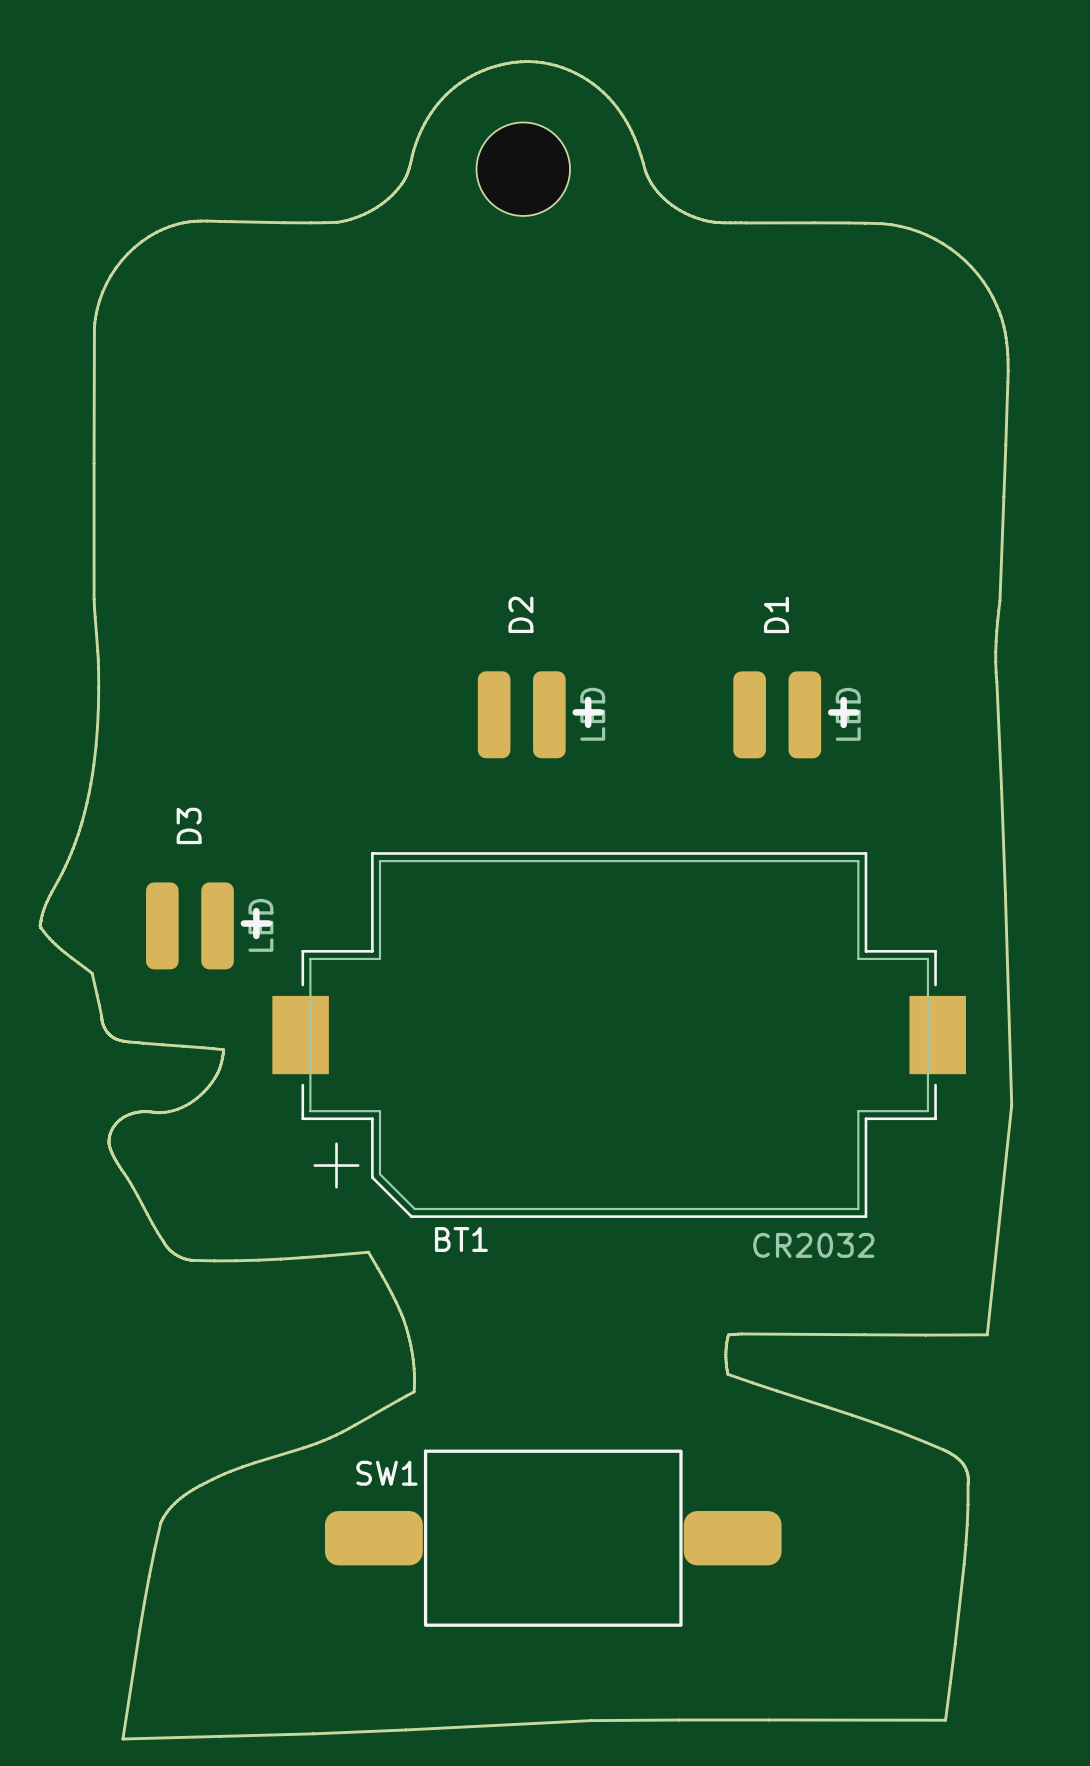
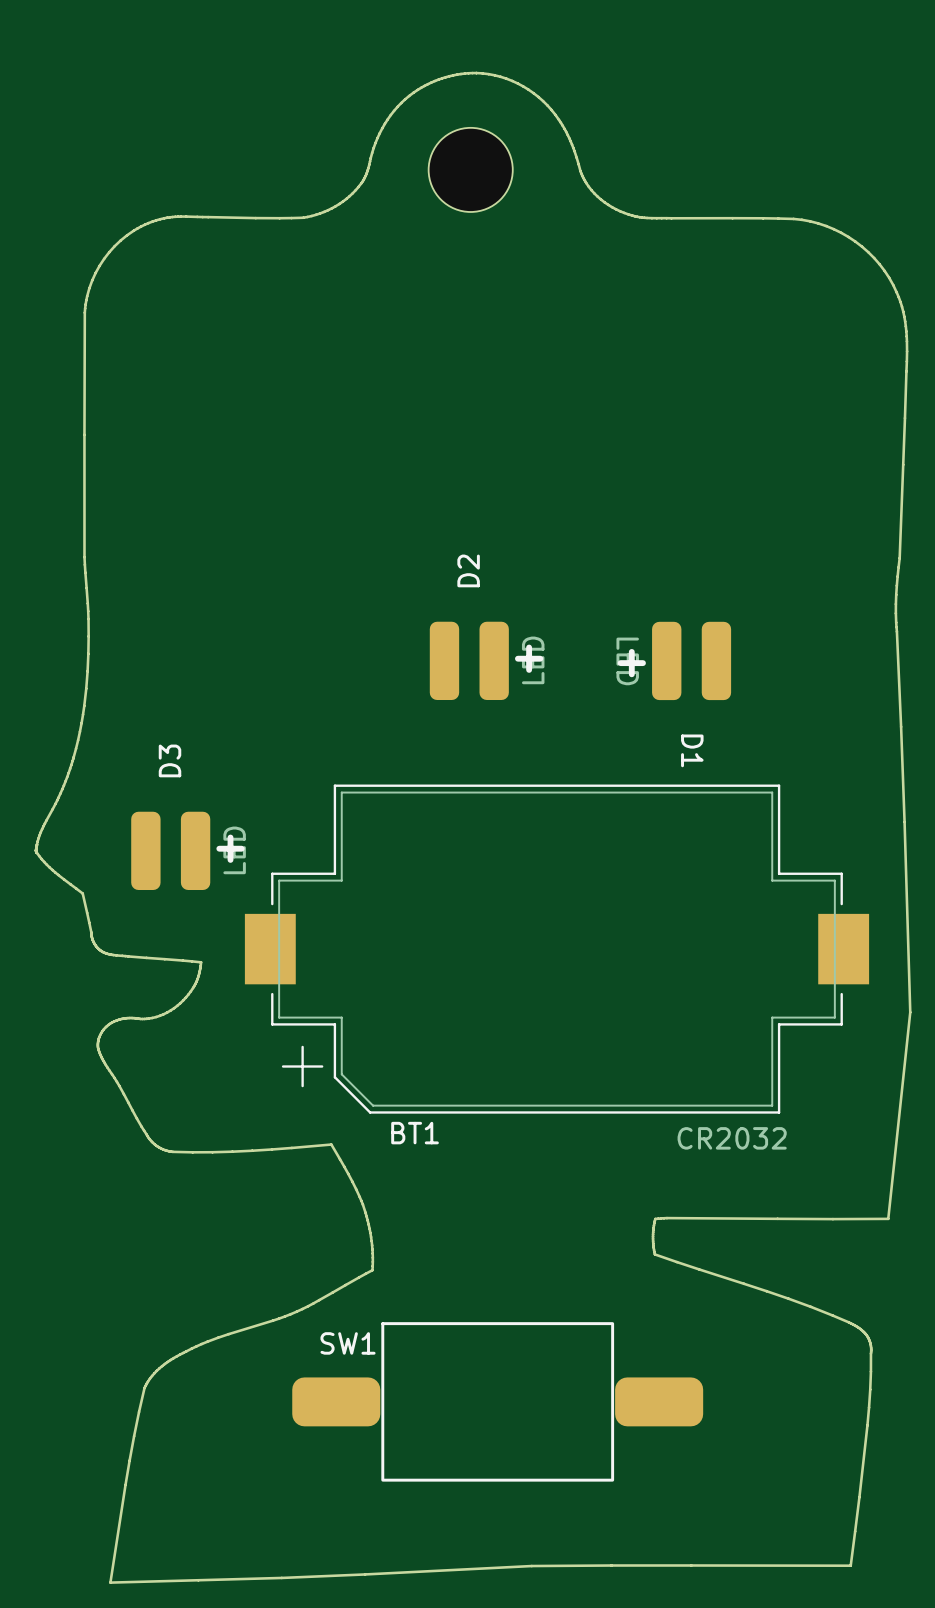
D1 rotation: 0° (777, 714) -> 180° (691, 660)

